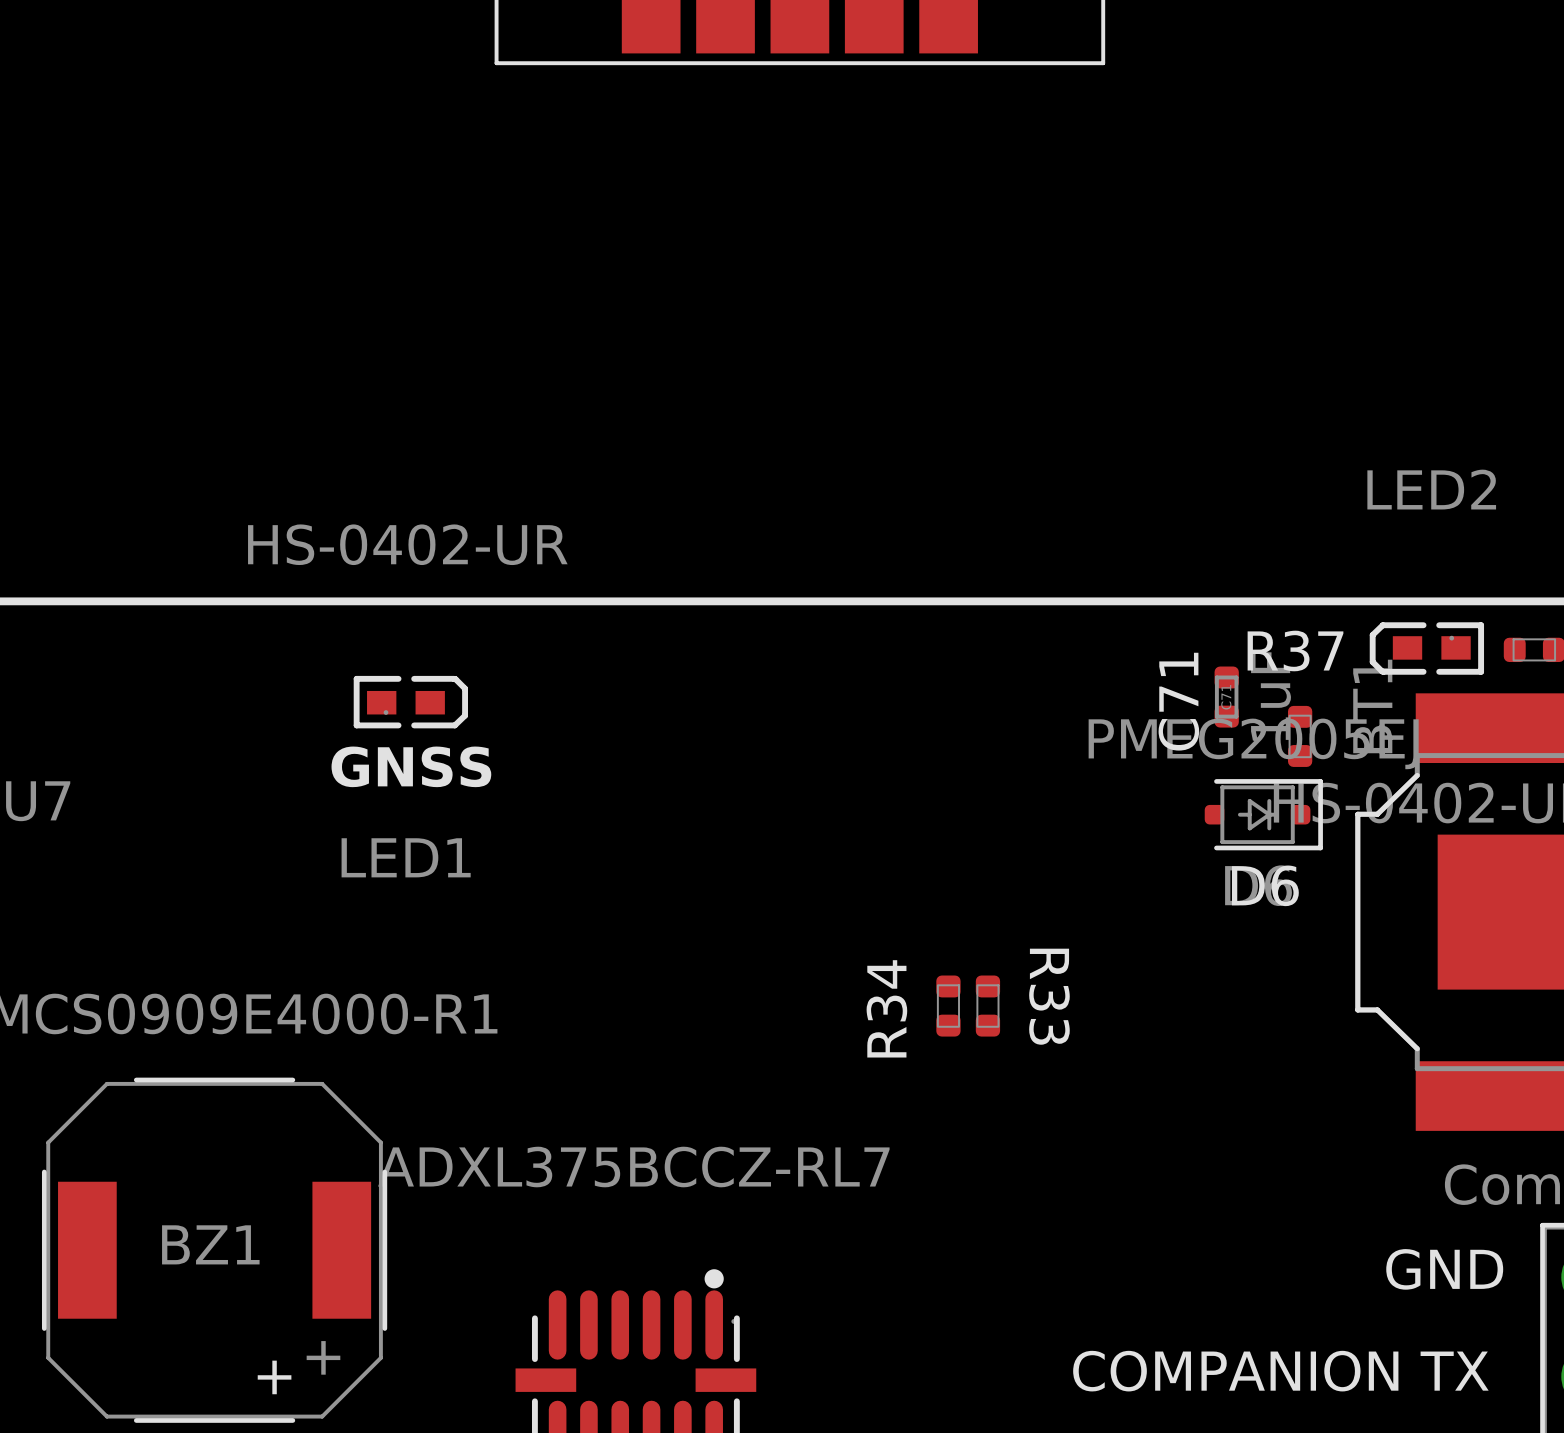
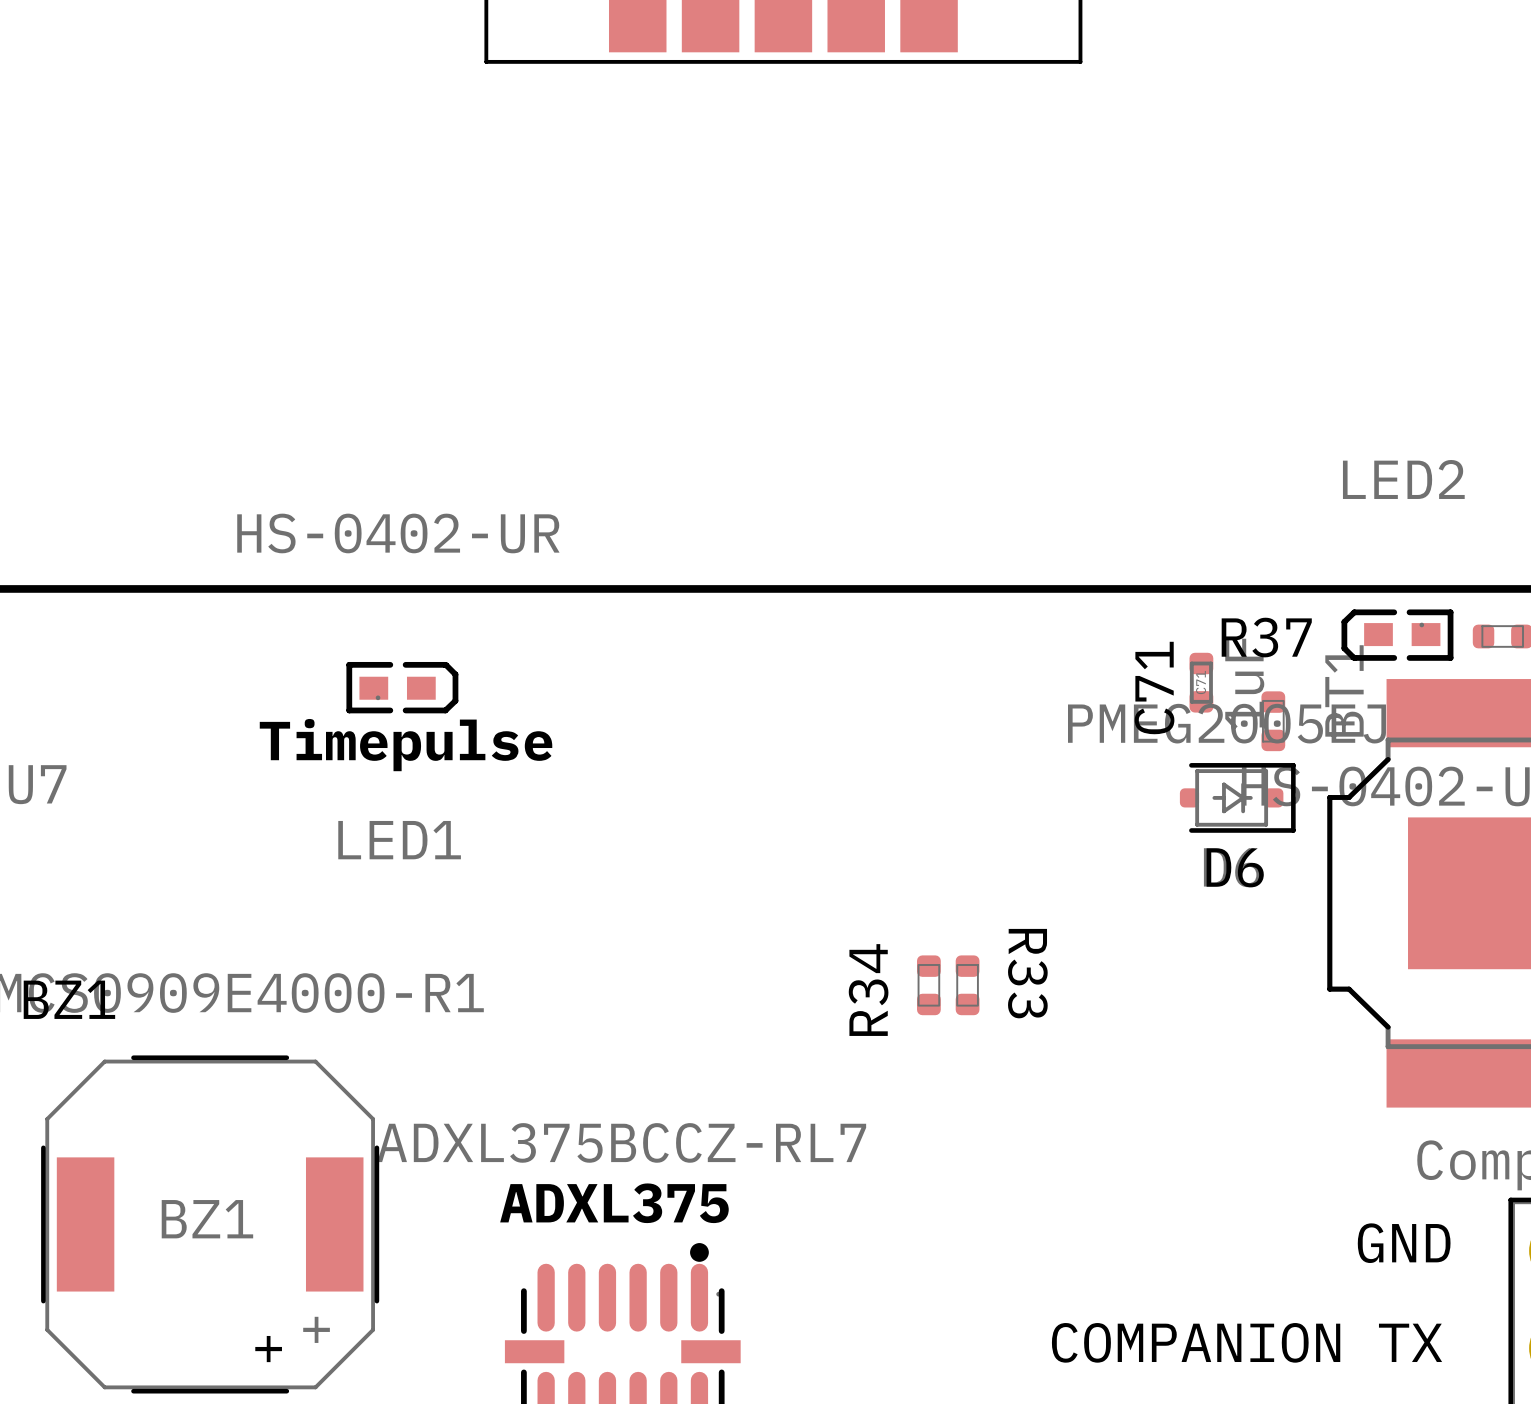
text: none -> Timepulse (406, 745)
text: GNSS (411, 766) -> none
text: none -> BZ1 (69, 999)
text: none -> ADXL375 (614, 1203)

